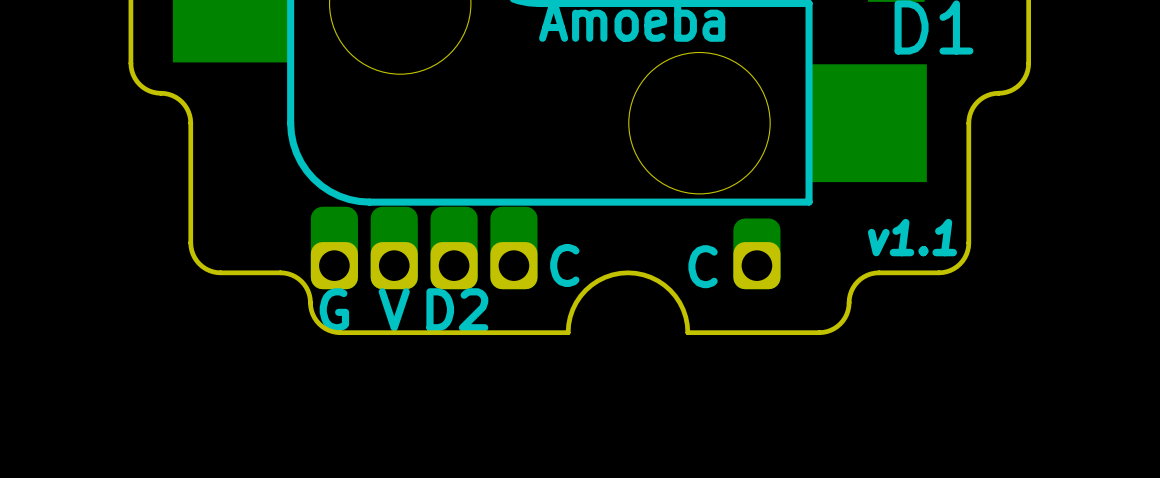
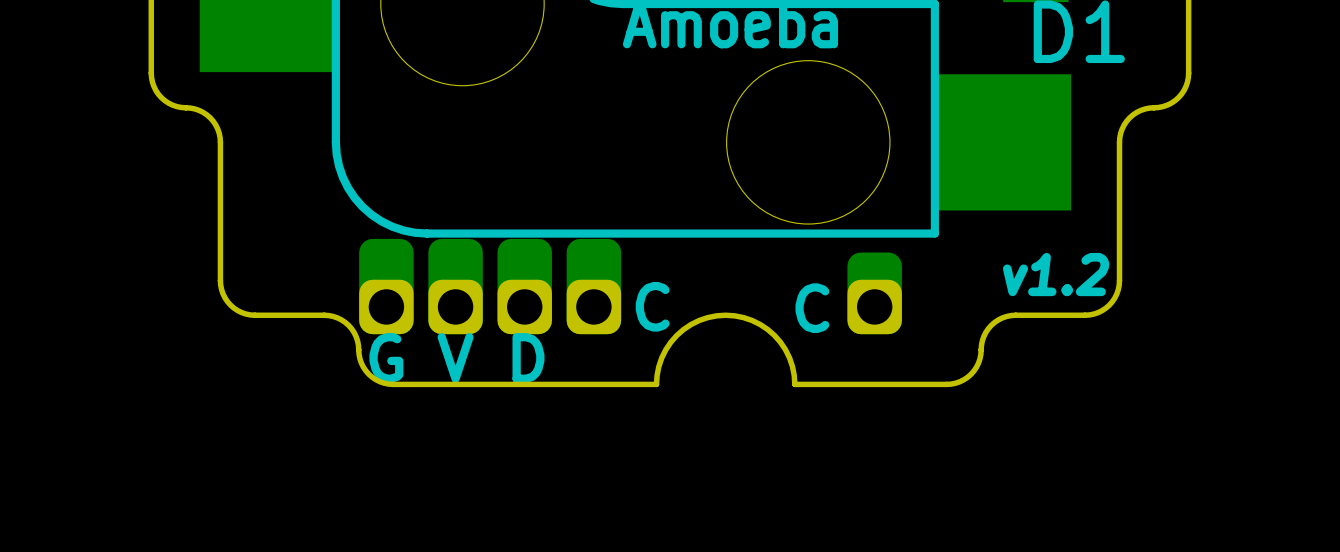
text: v1.1 (912, 237) -> v1.2 (1056, 274)
text: D2 (457, 309) -> D (528, 357)

